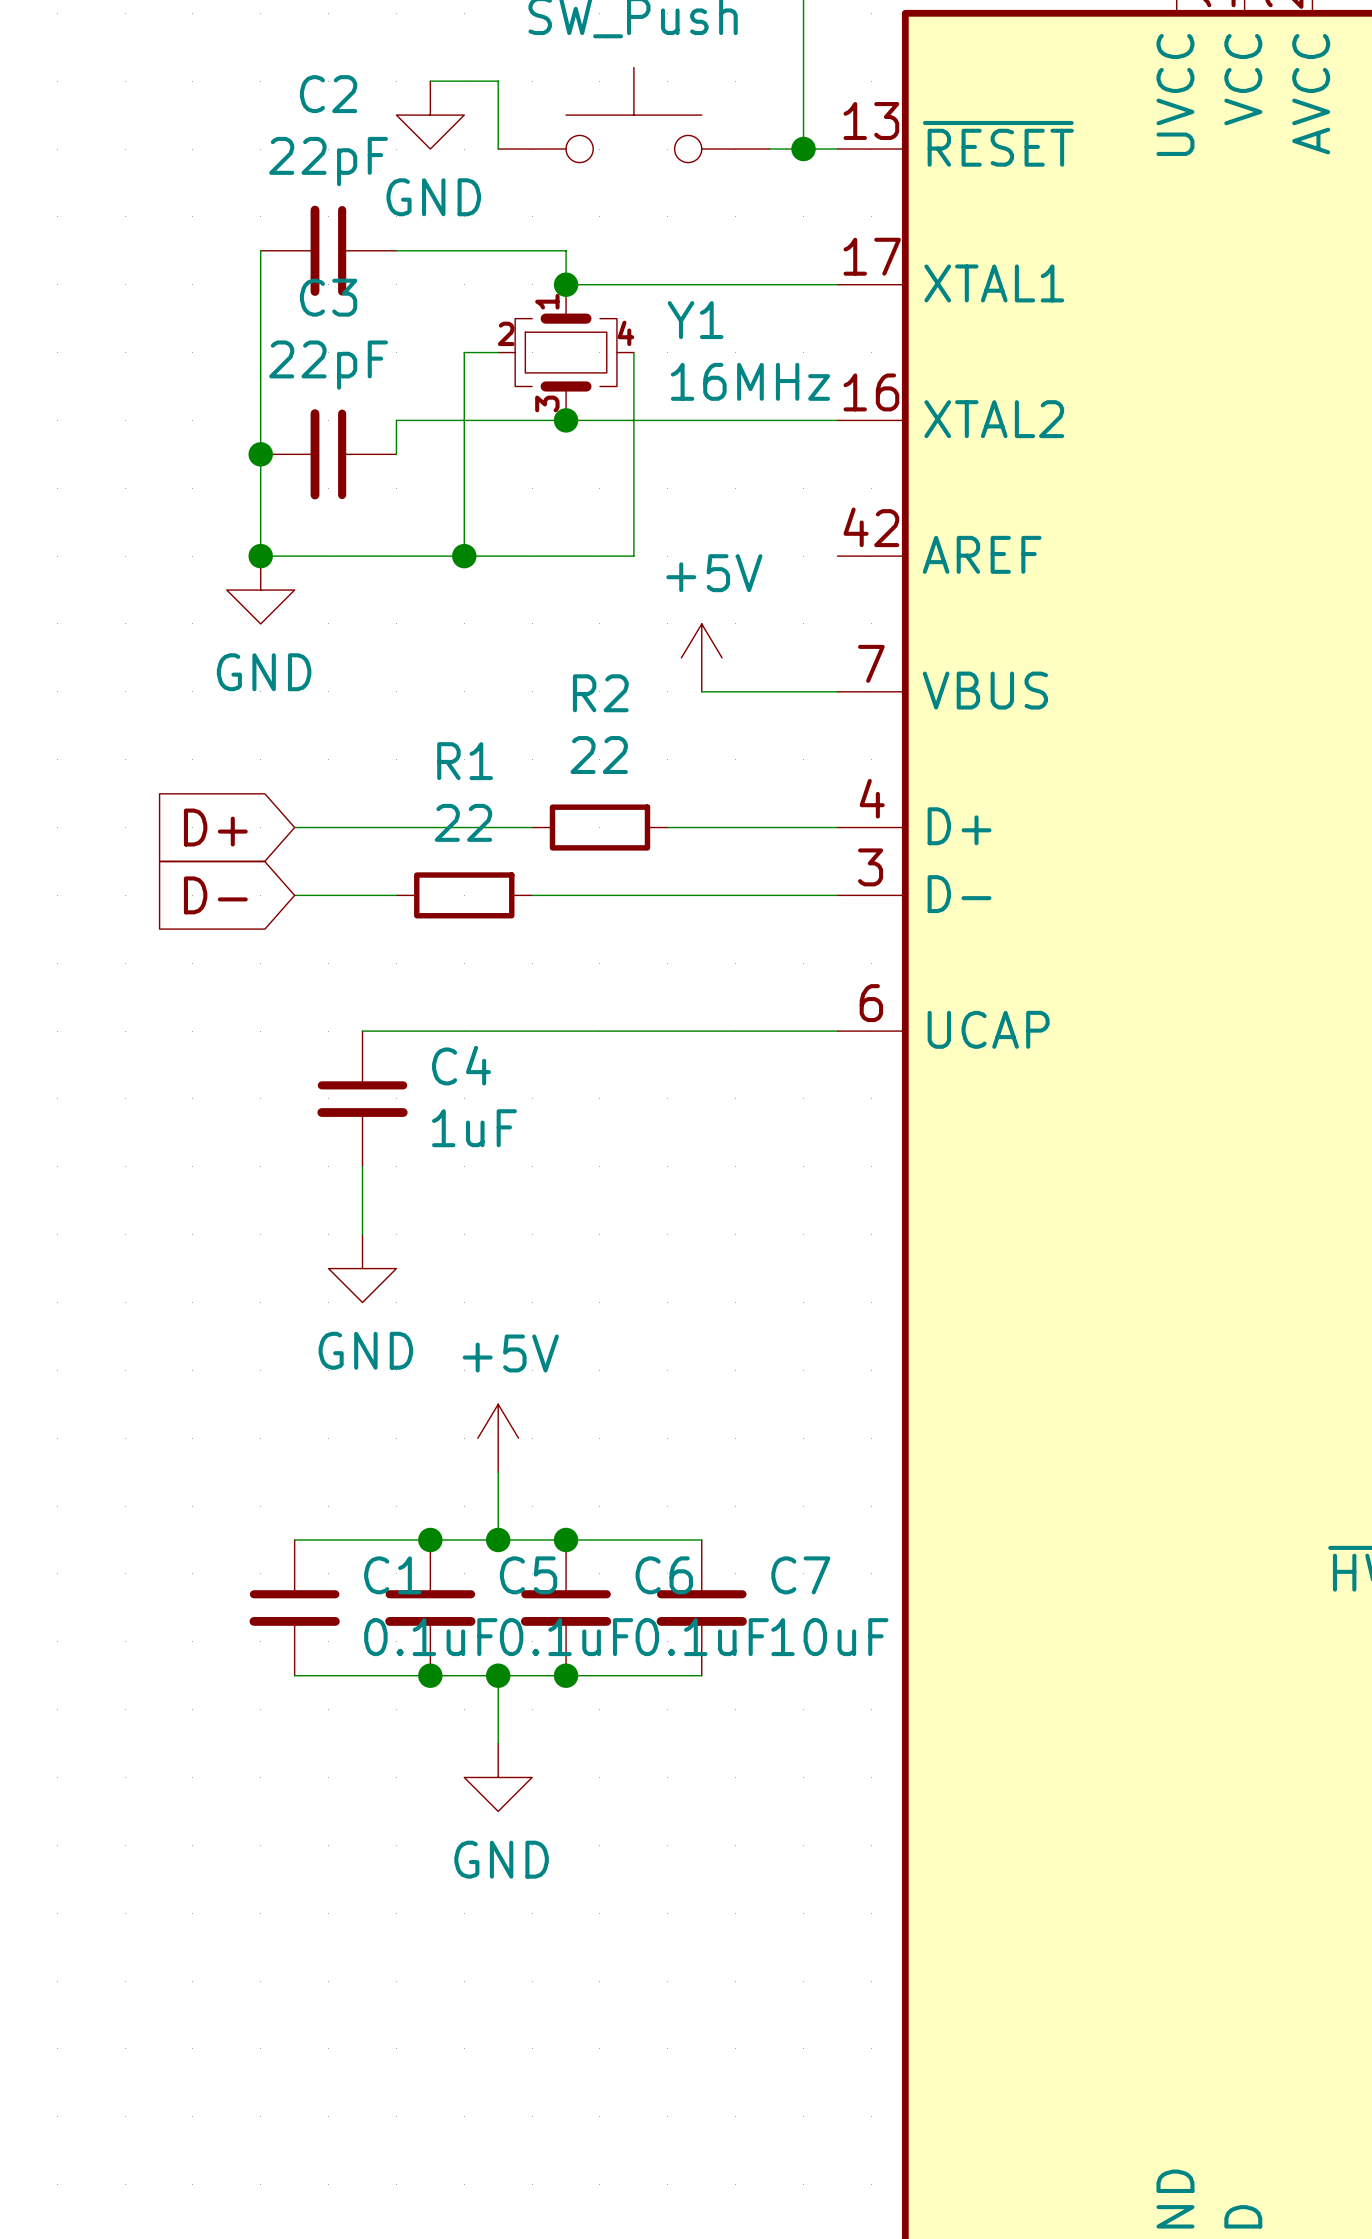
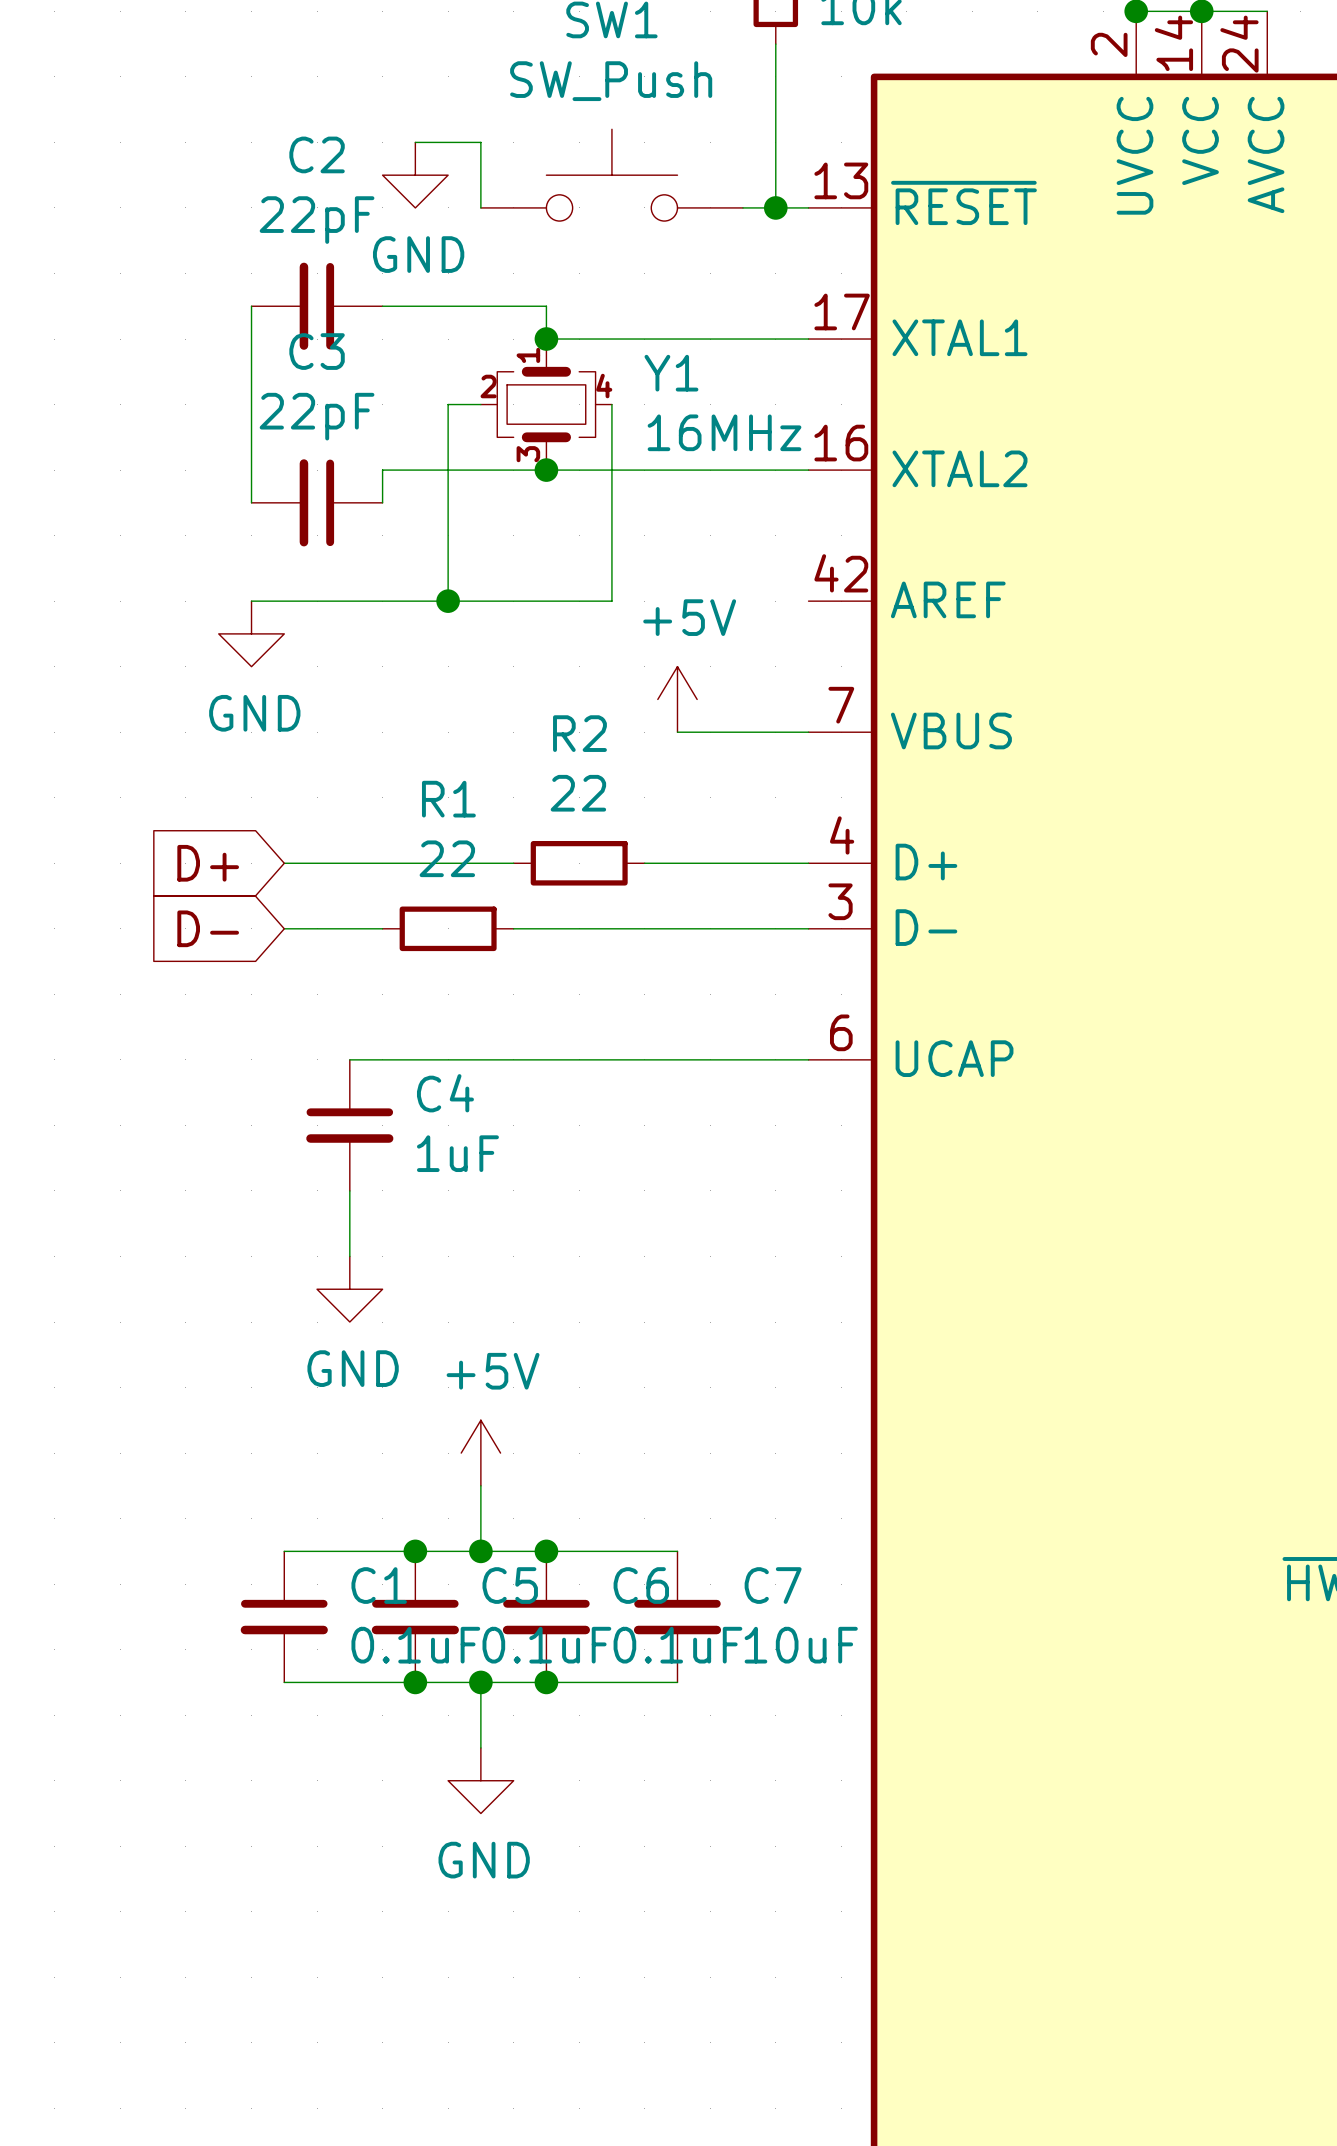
wire: (260, 454) (260, 556) -> none
junction: (260, 454) -> none
junction: (260, 556) -> none

